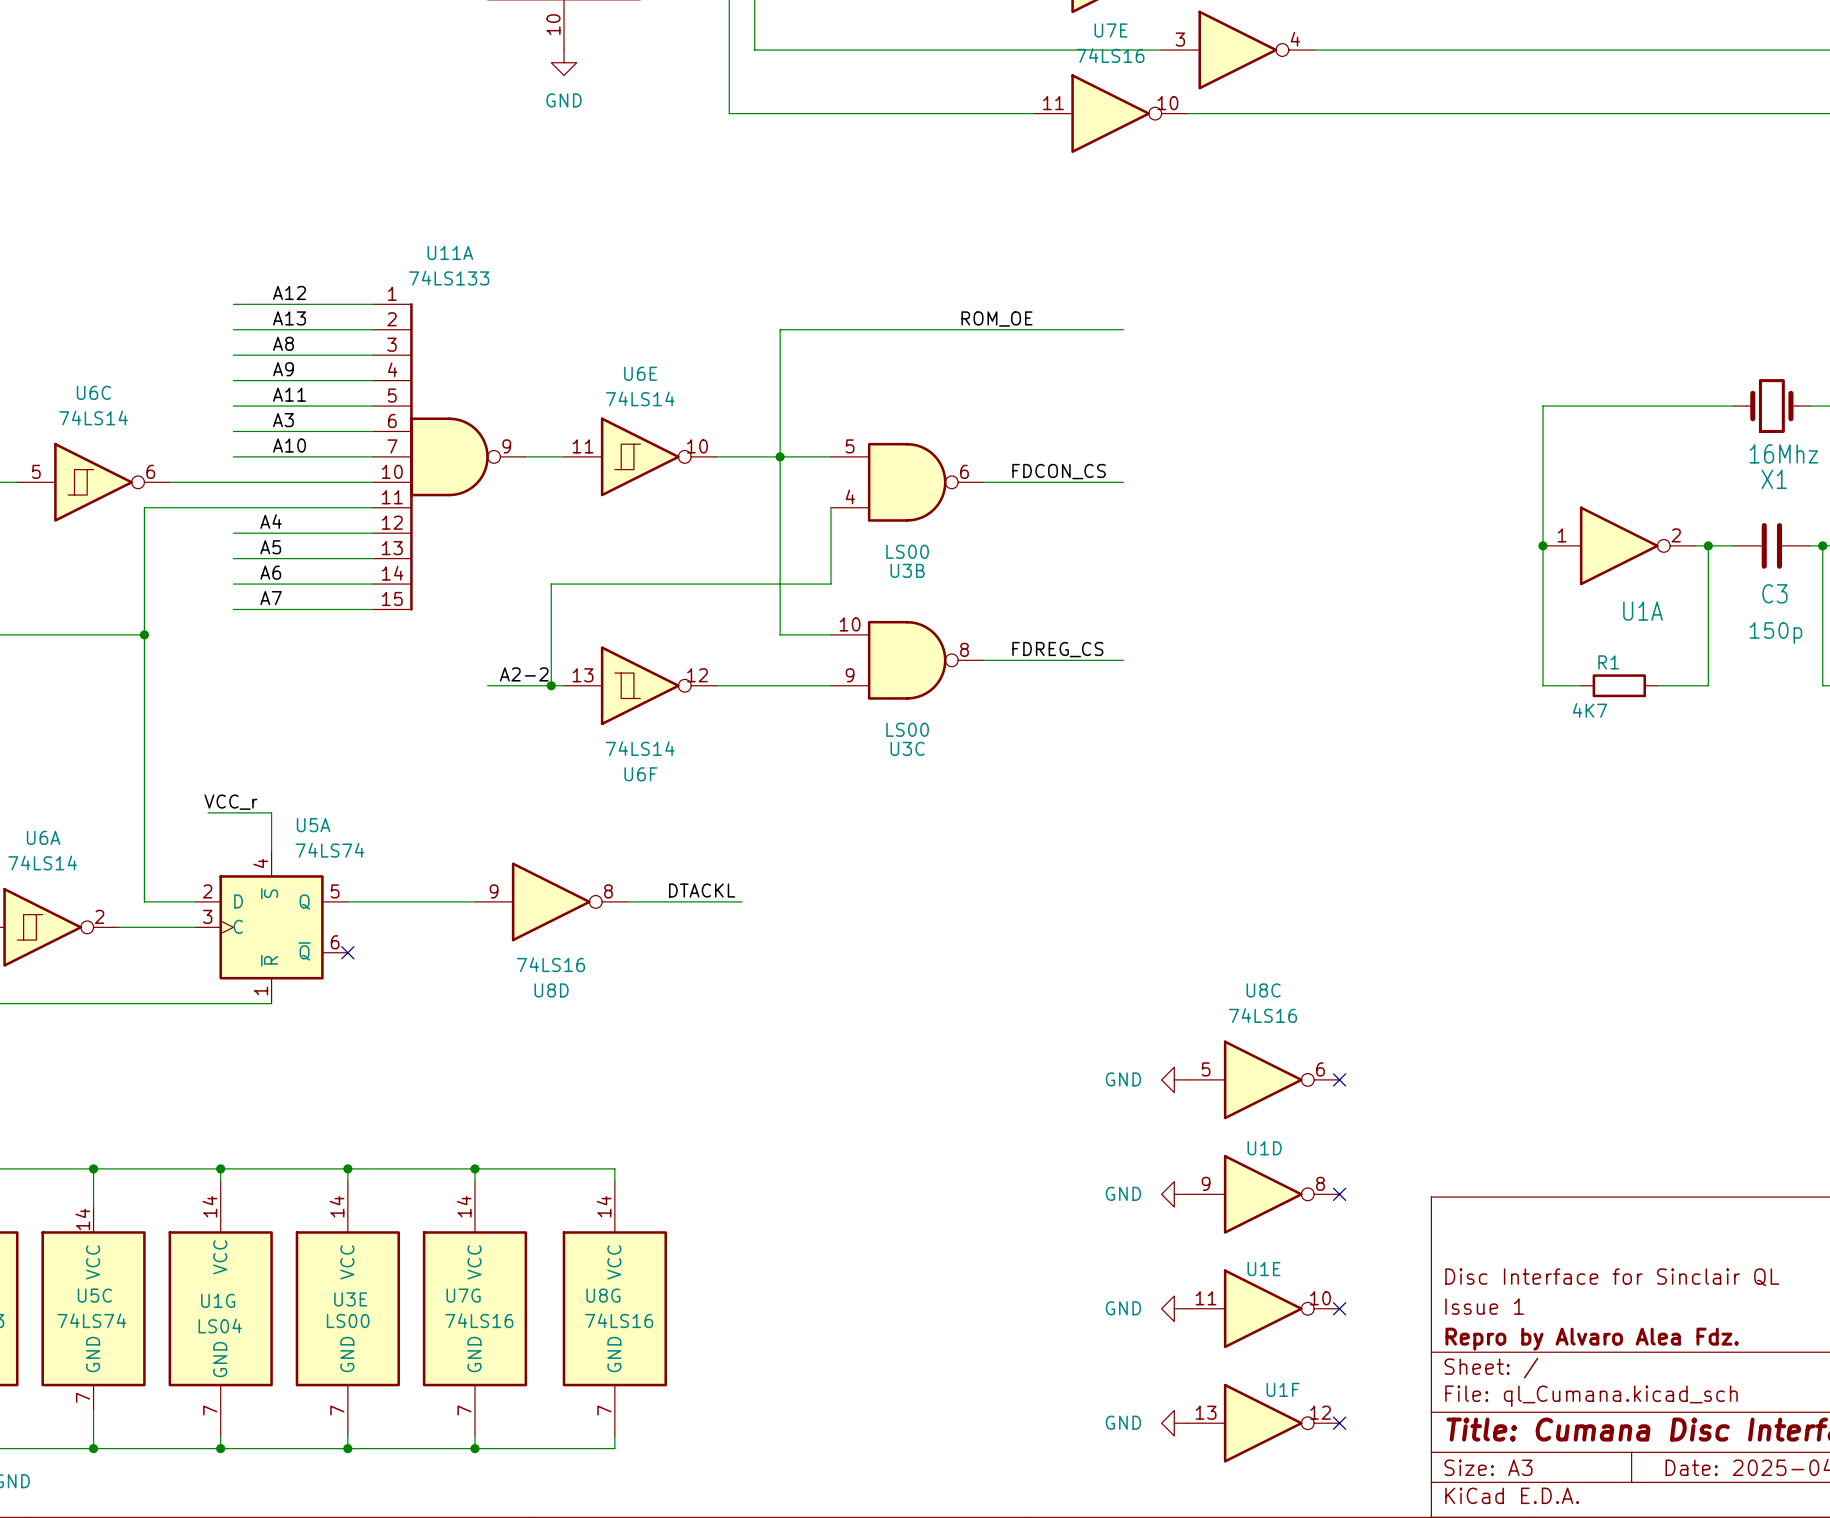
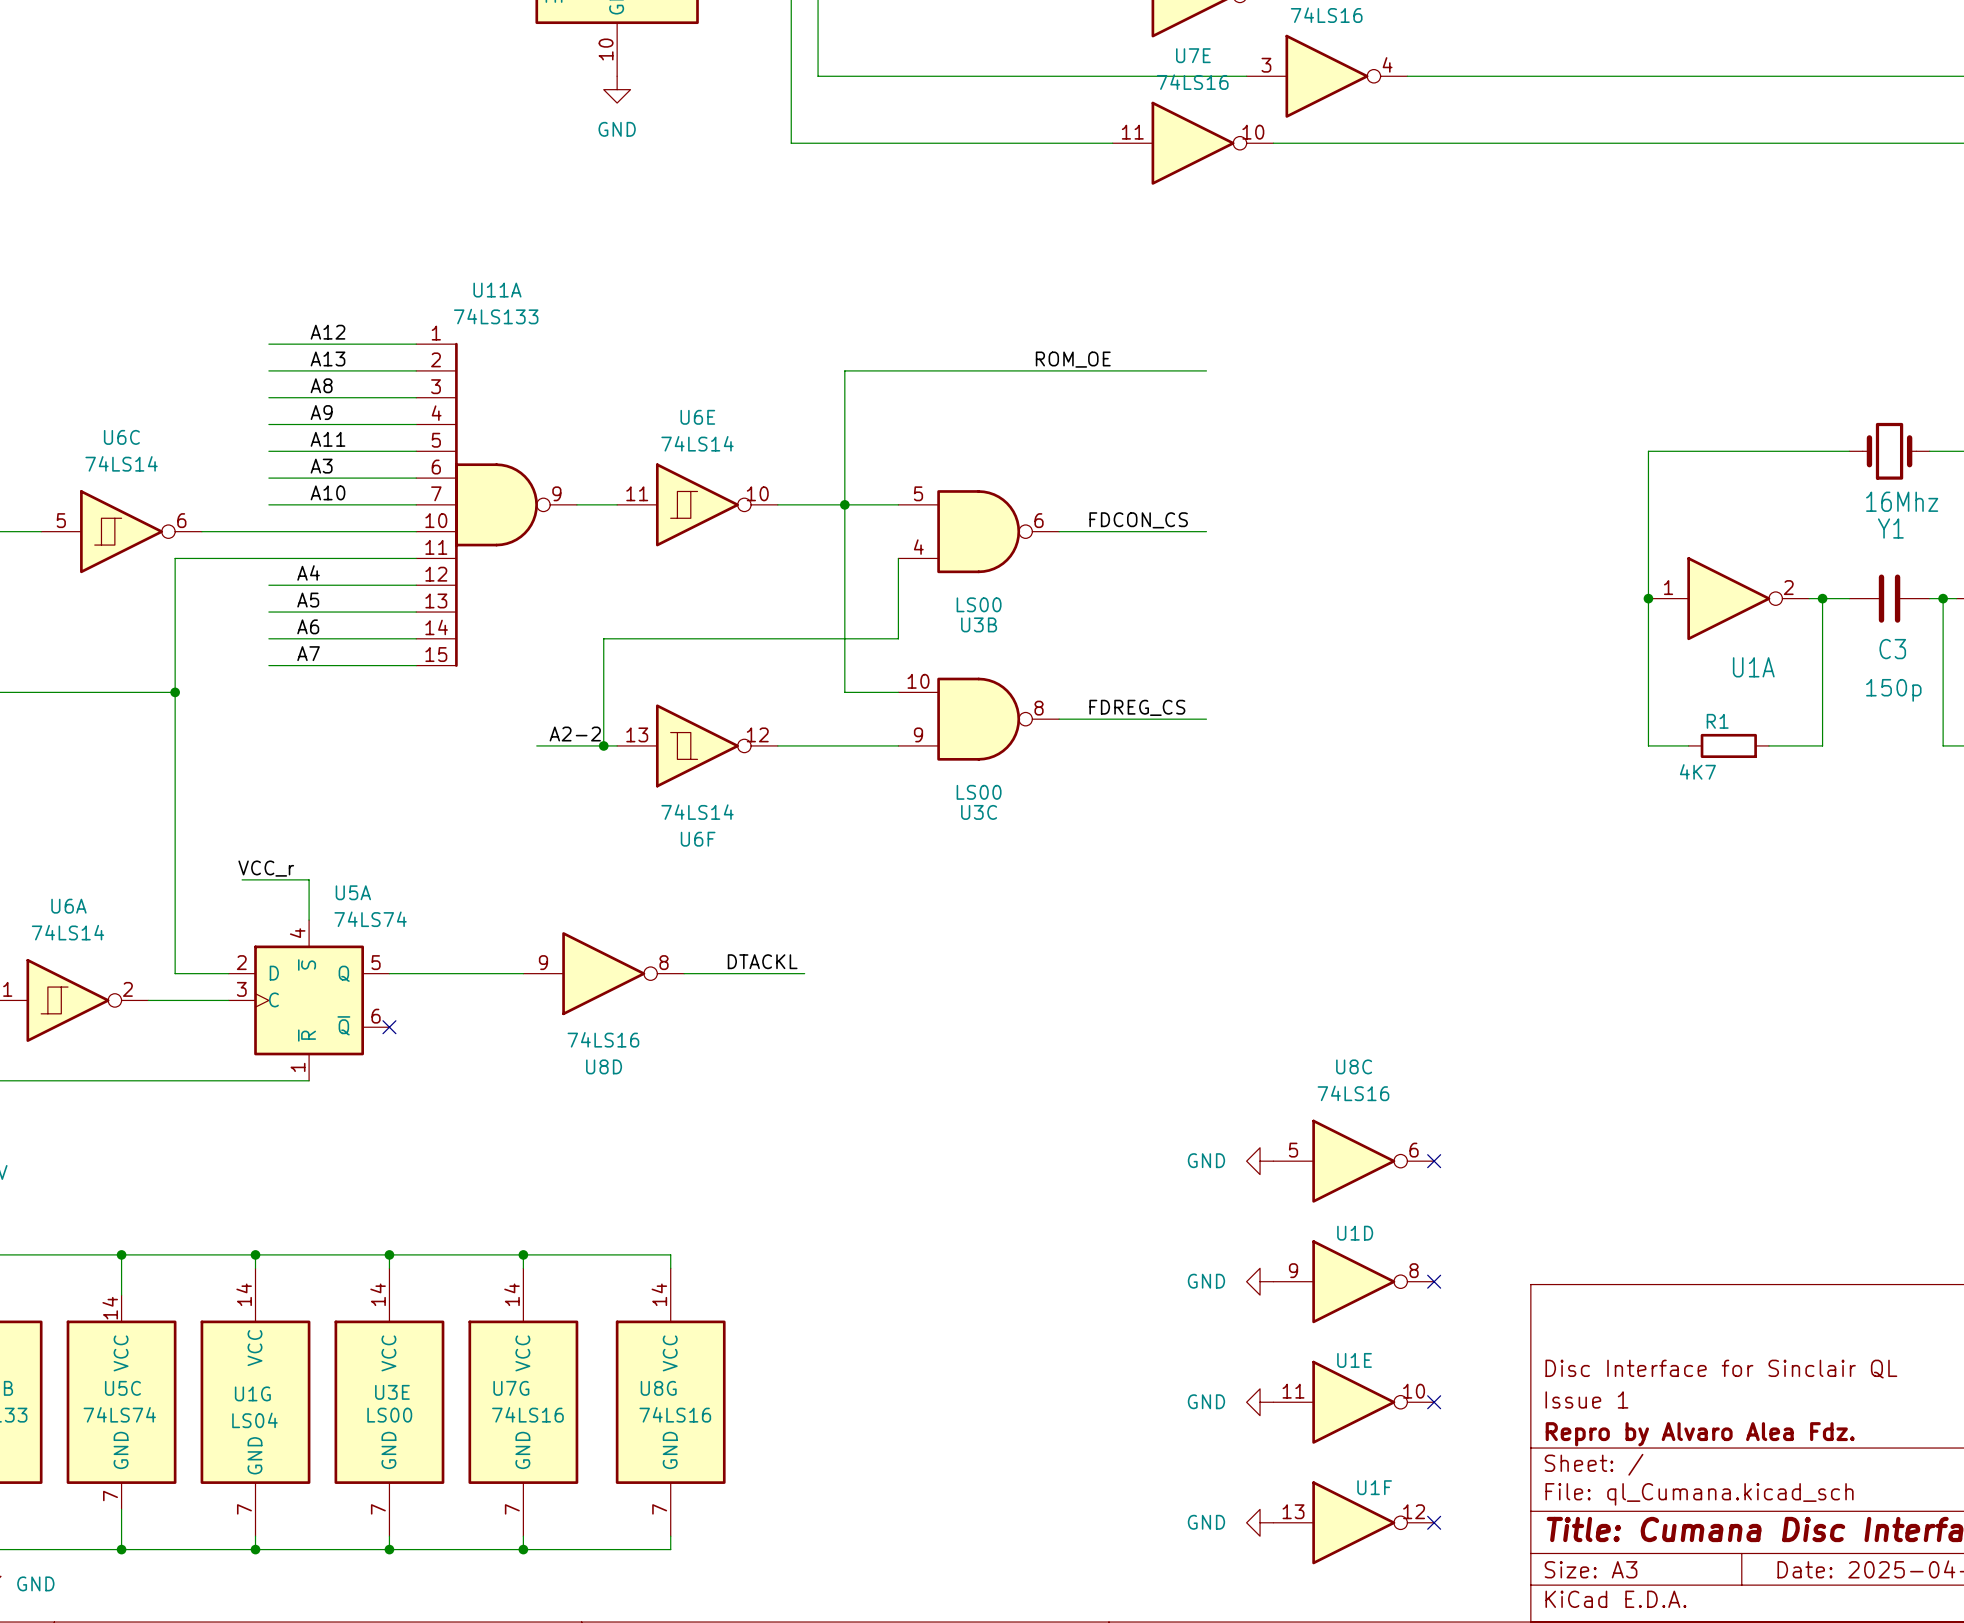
X1 name: X1 (1774, 479) -> Y1 (1890, 528)

